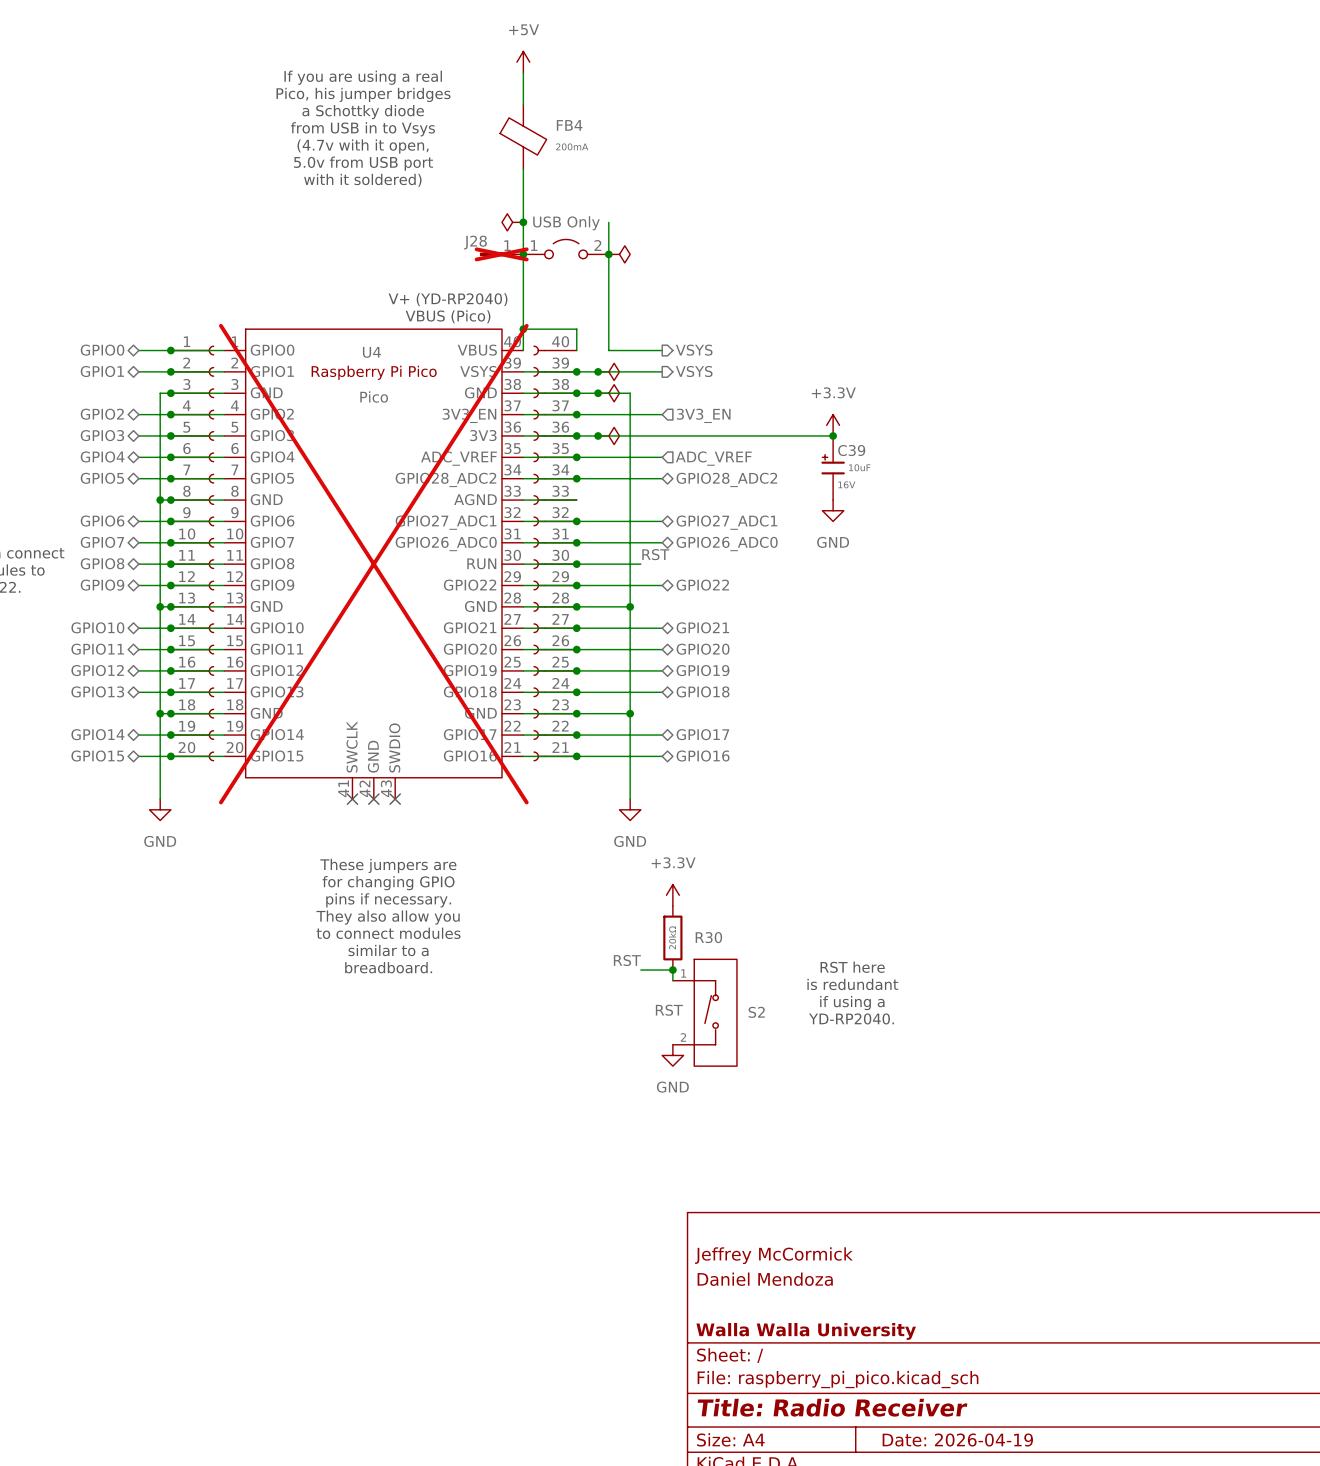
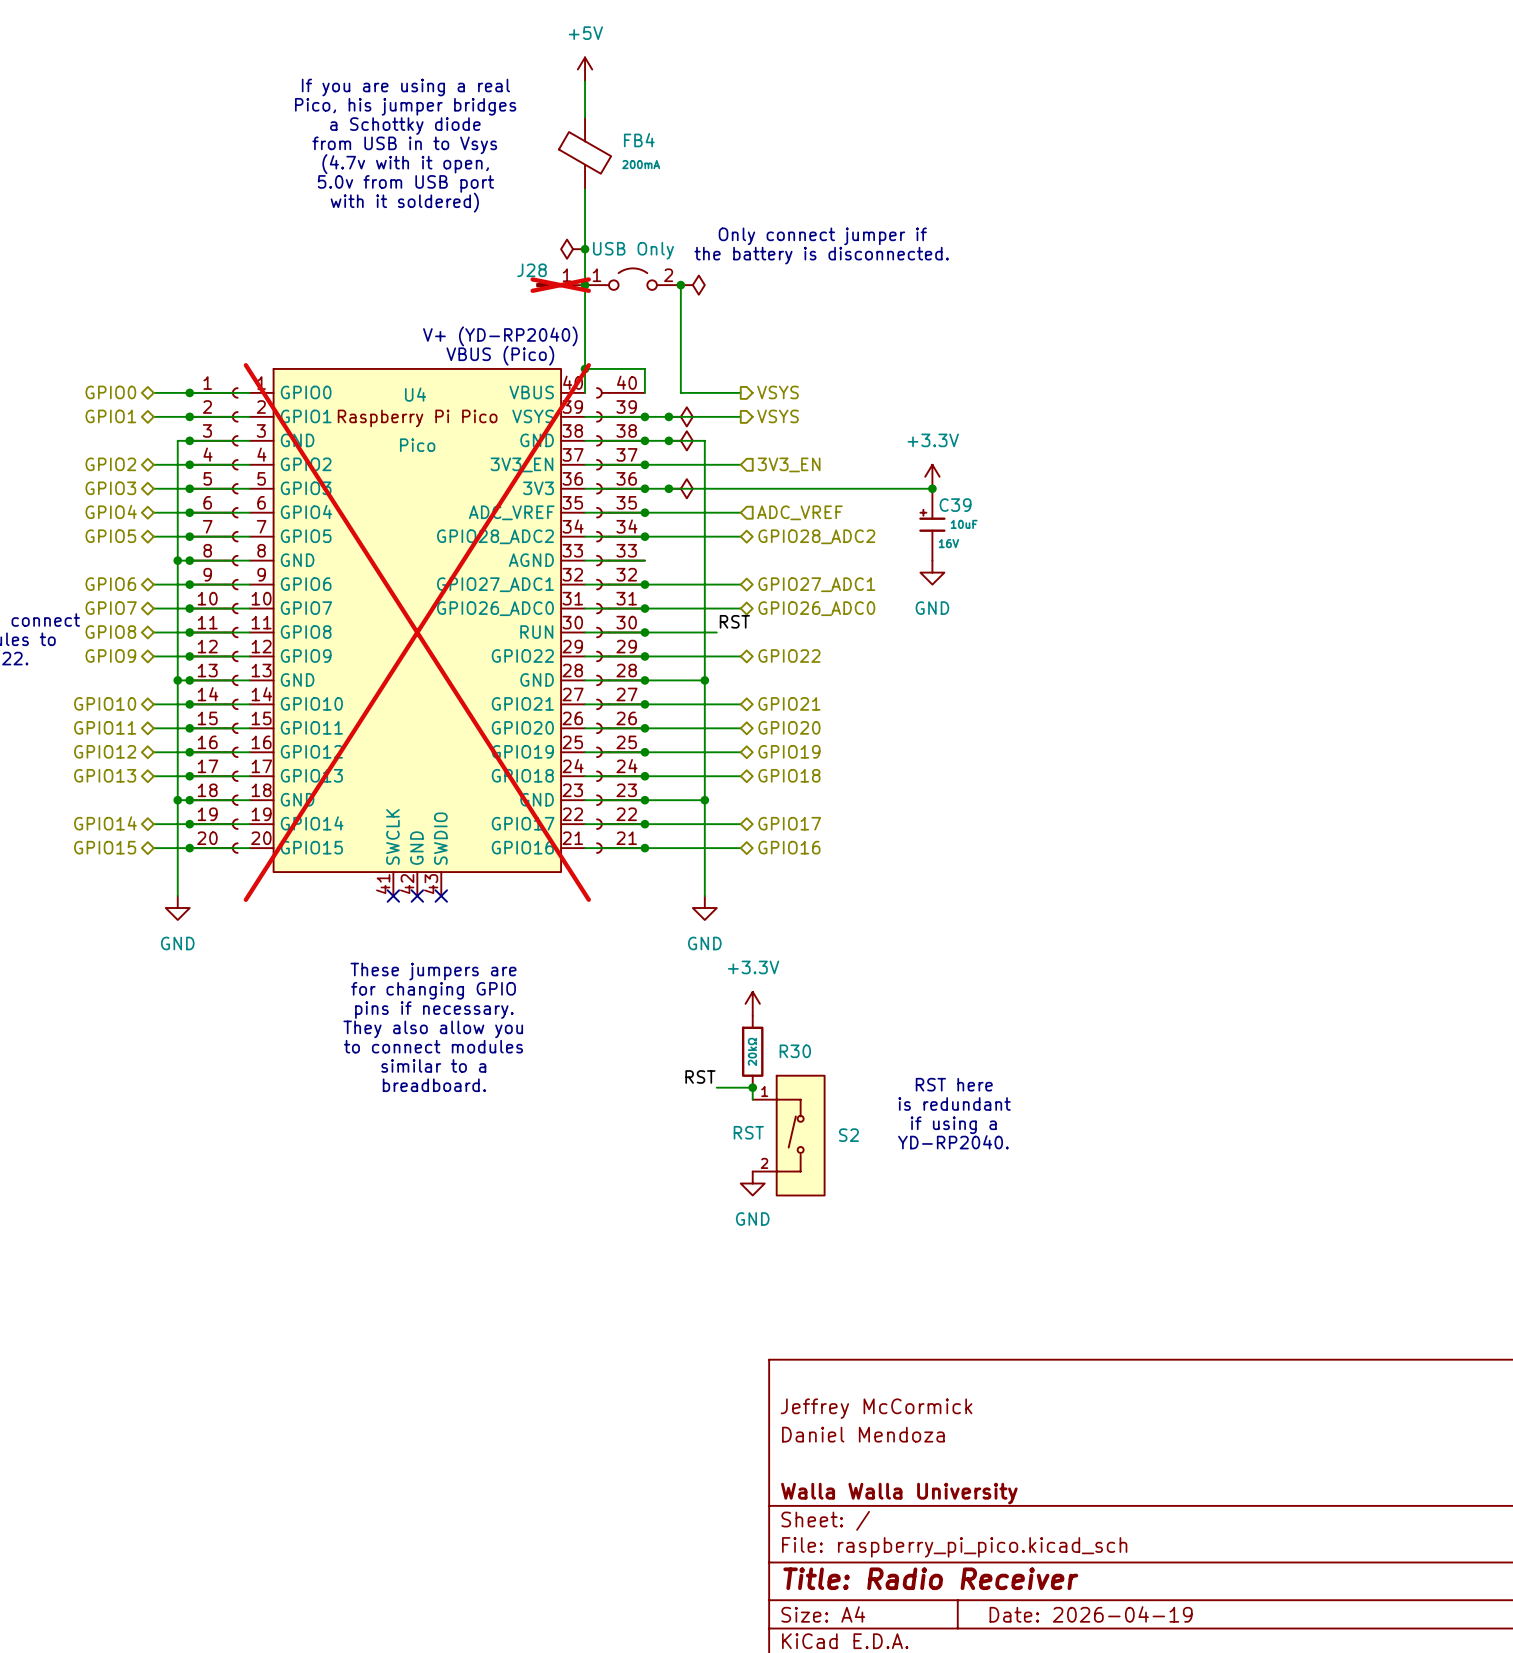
text: none -> Only connect jumper if (822, 236)
wire: (608, 222) (608, 254) -> none
text: none -> the battery is disconnected. (821, 255)

